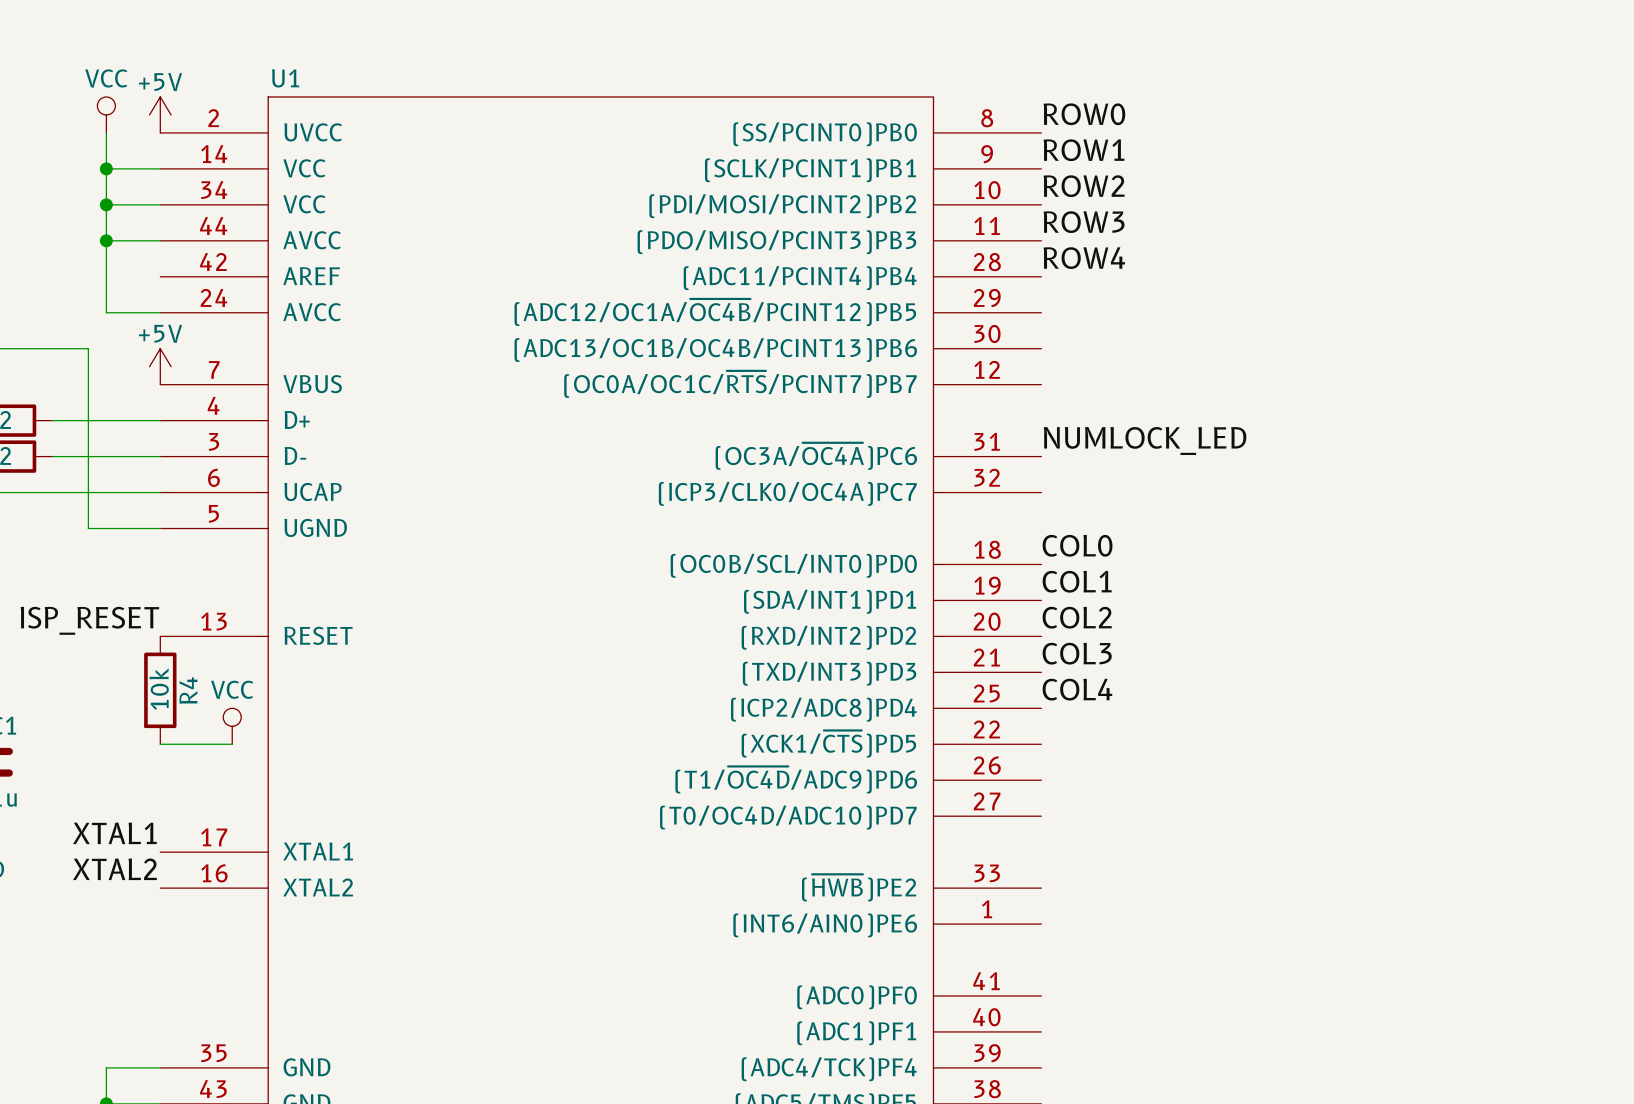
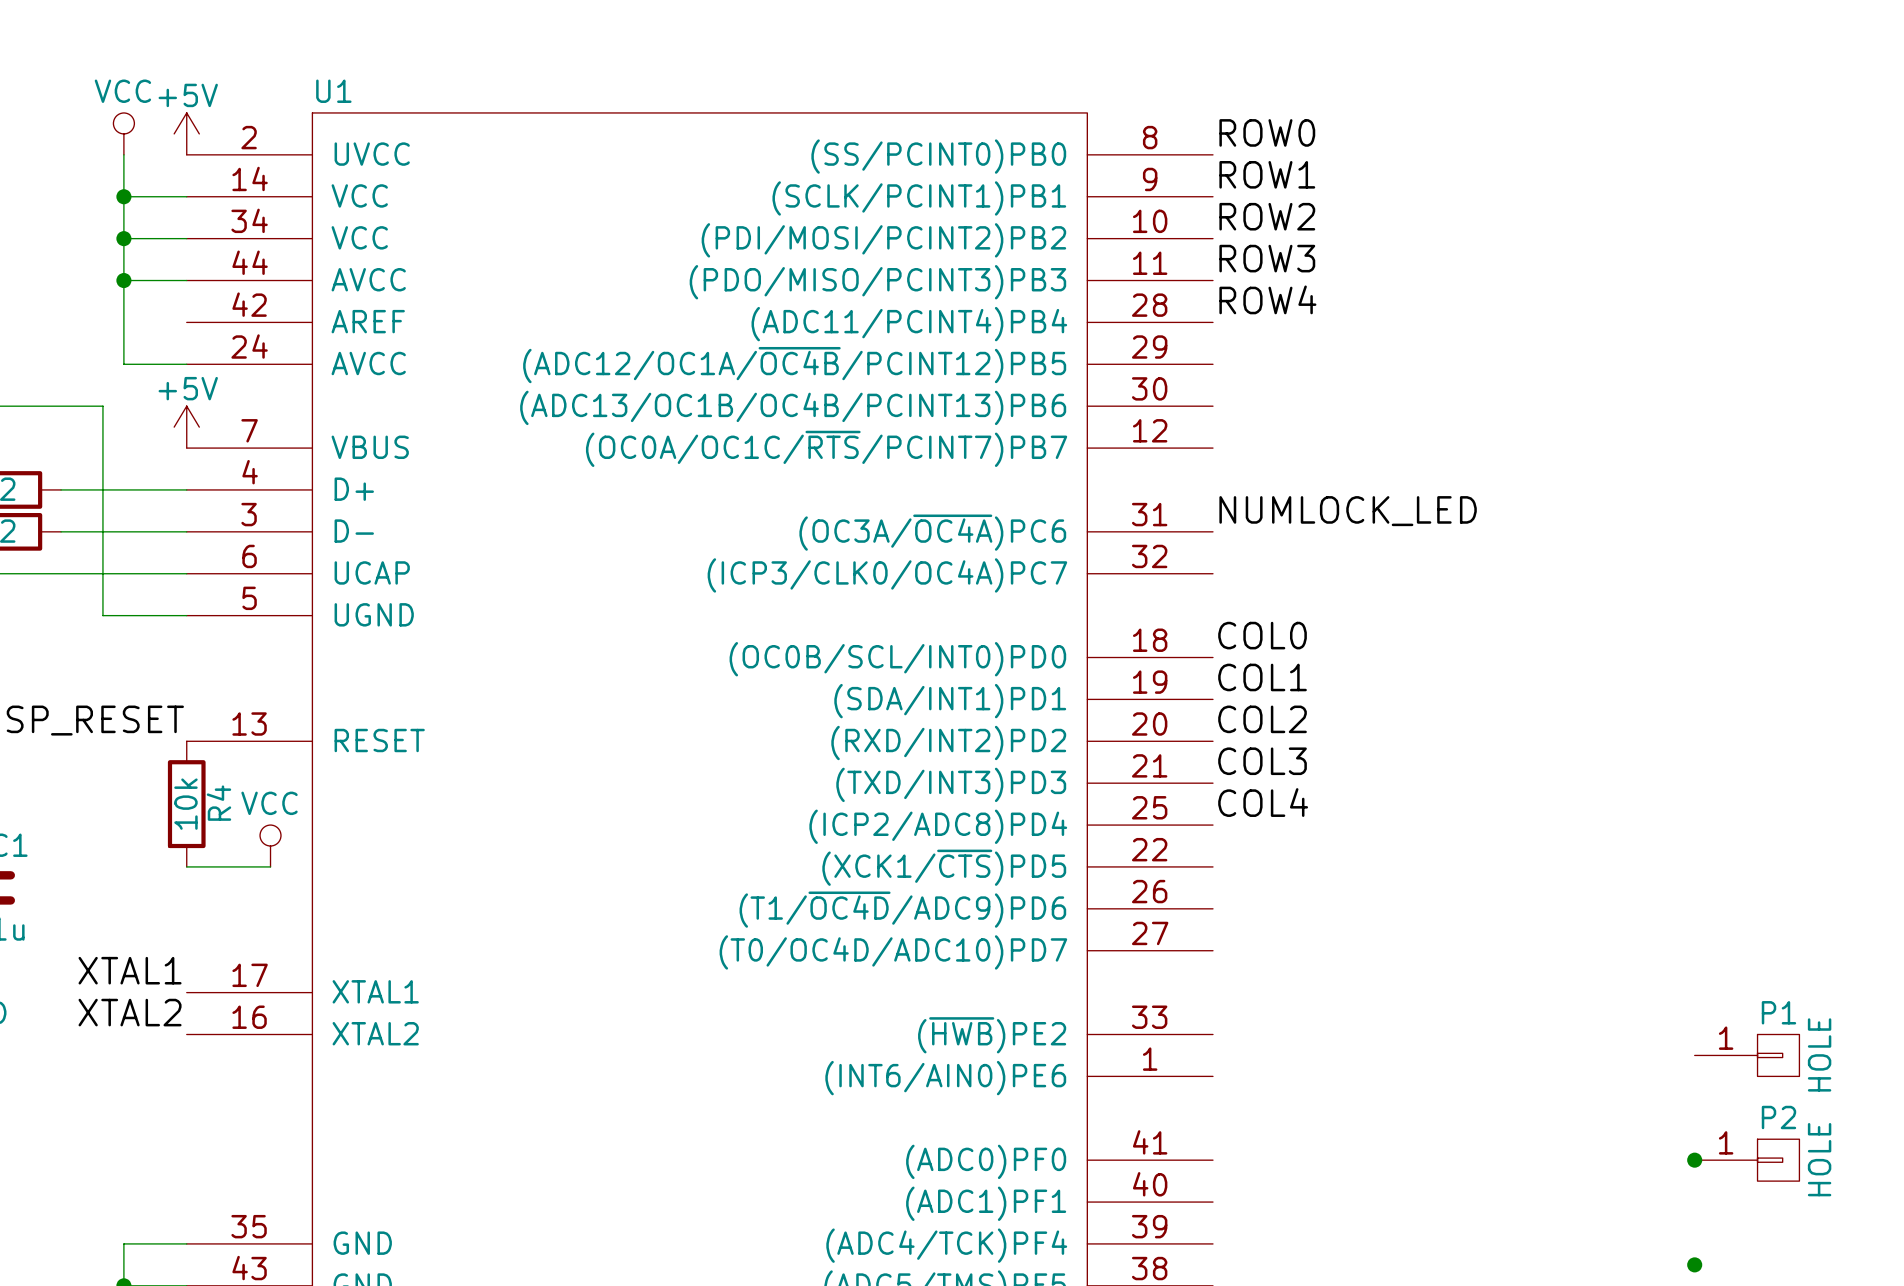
P1: none -> HOLE (1747, 1055)
junction: none -> (1694, 1160)
P2: none -> HOLE (1747, 1160)
junction: none -> (1694, 1264)

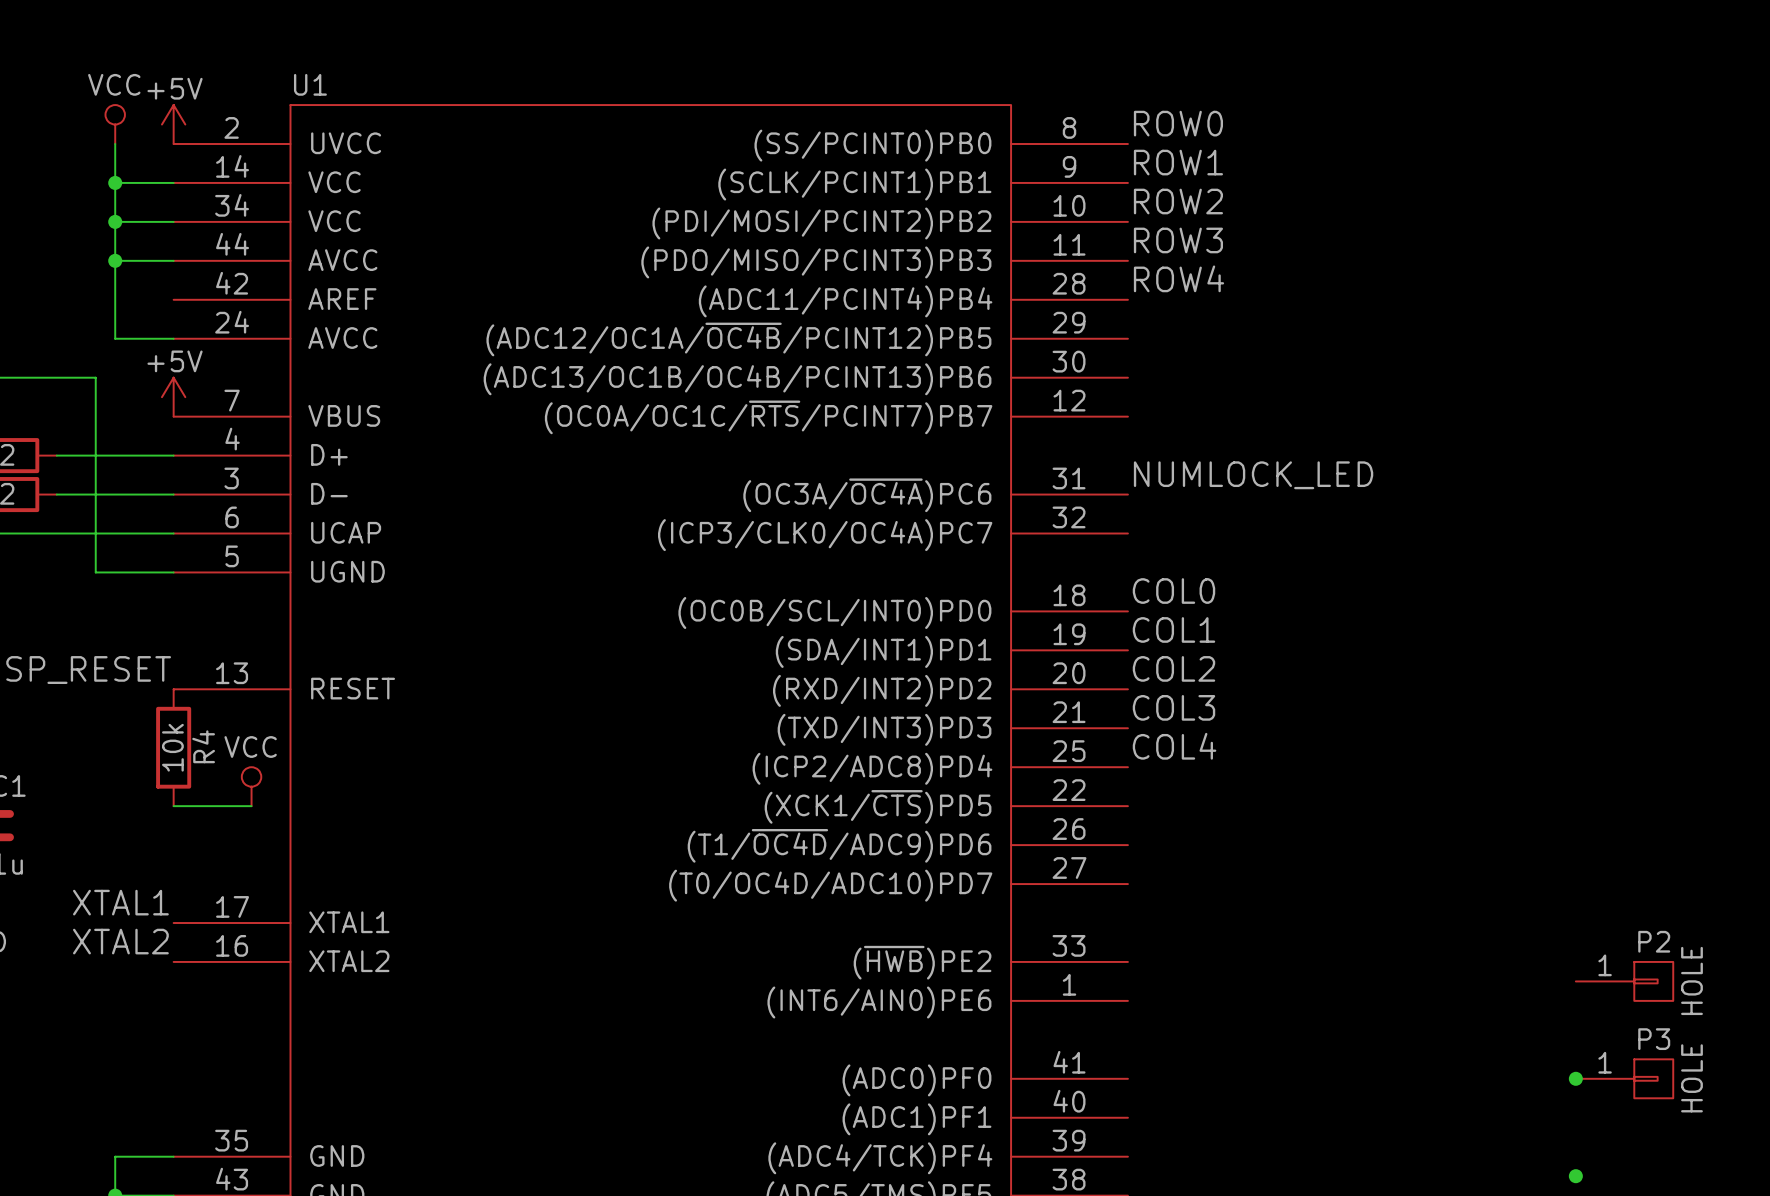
P1 name: P1 (1778, 1012) -> P2 (1654, 941)
P2 name: P2 (1778, 1117) -> P3 (1654, 1039)

